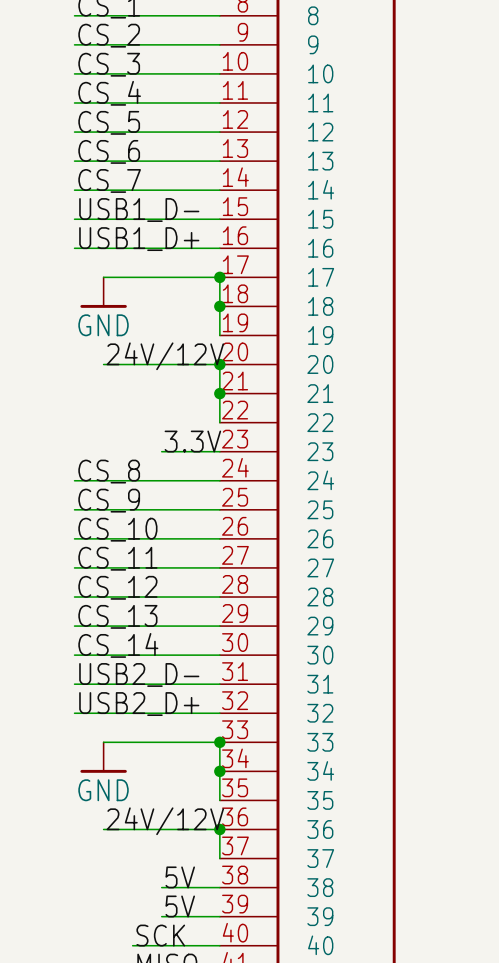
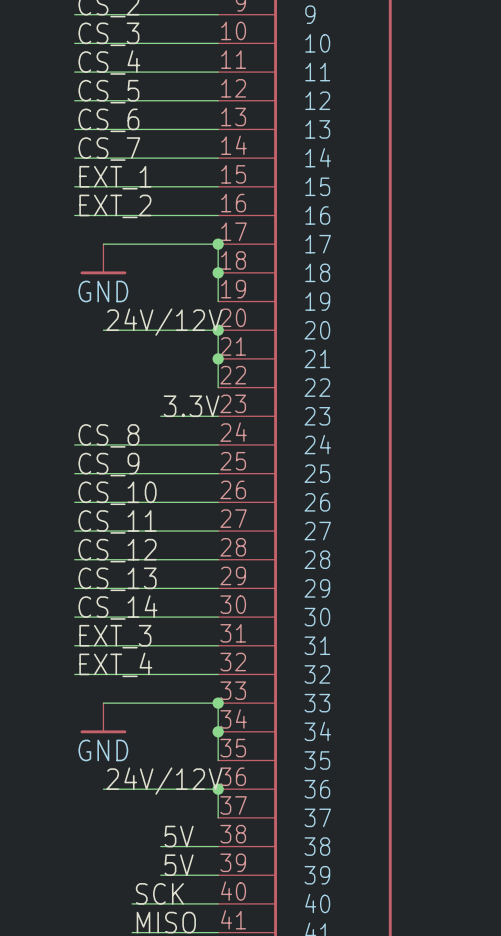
label: USB1_D- (139, 210) -> EXT_1 (115, 177)
label: USB1_D+ (139, 239) -> EXT_2 (115, 206)
label: USB2_D- (139, 674) -> EXT_3 (115, 636)
label: USB2_D+ (139, 704) -> EXT_4 (115, 664)

